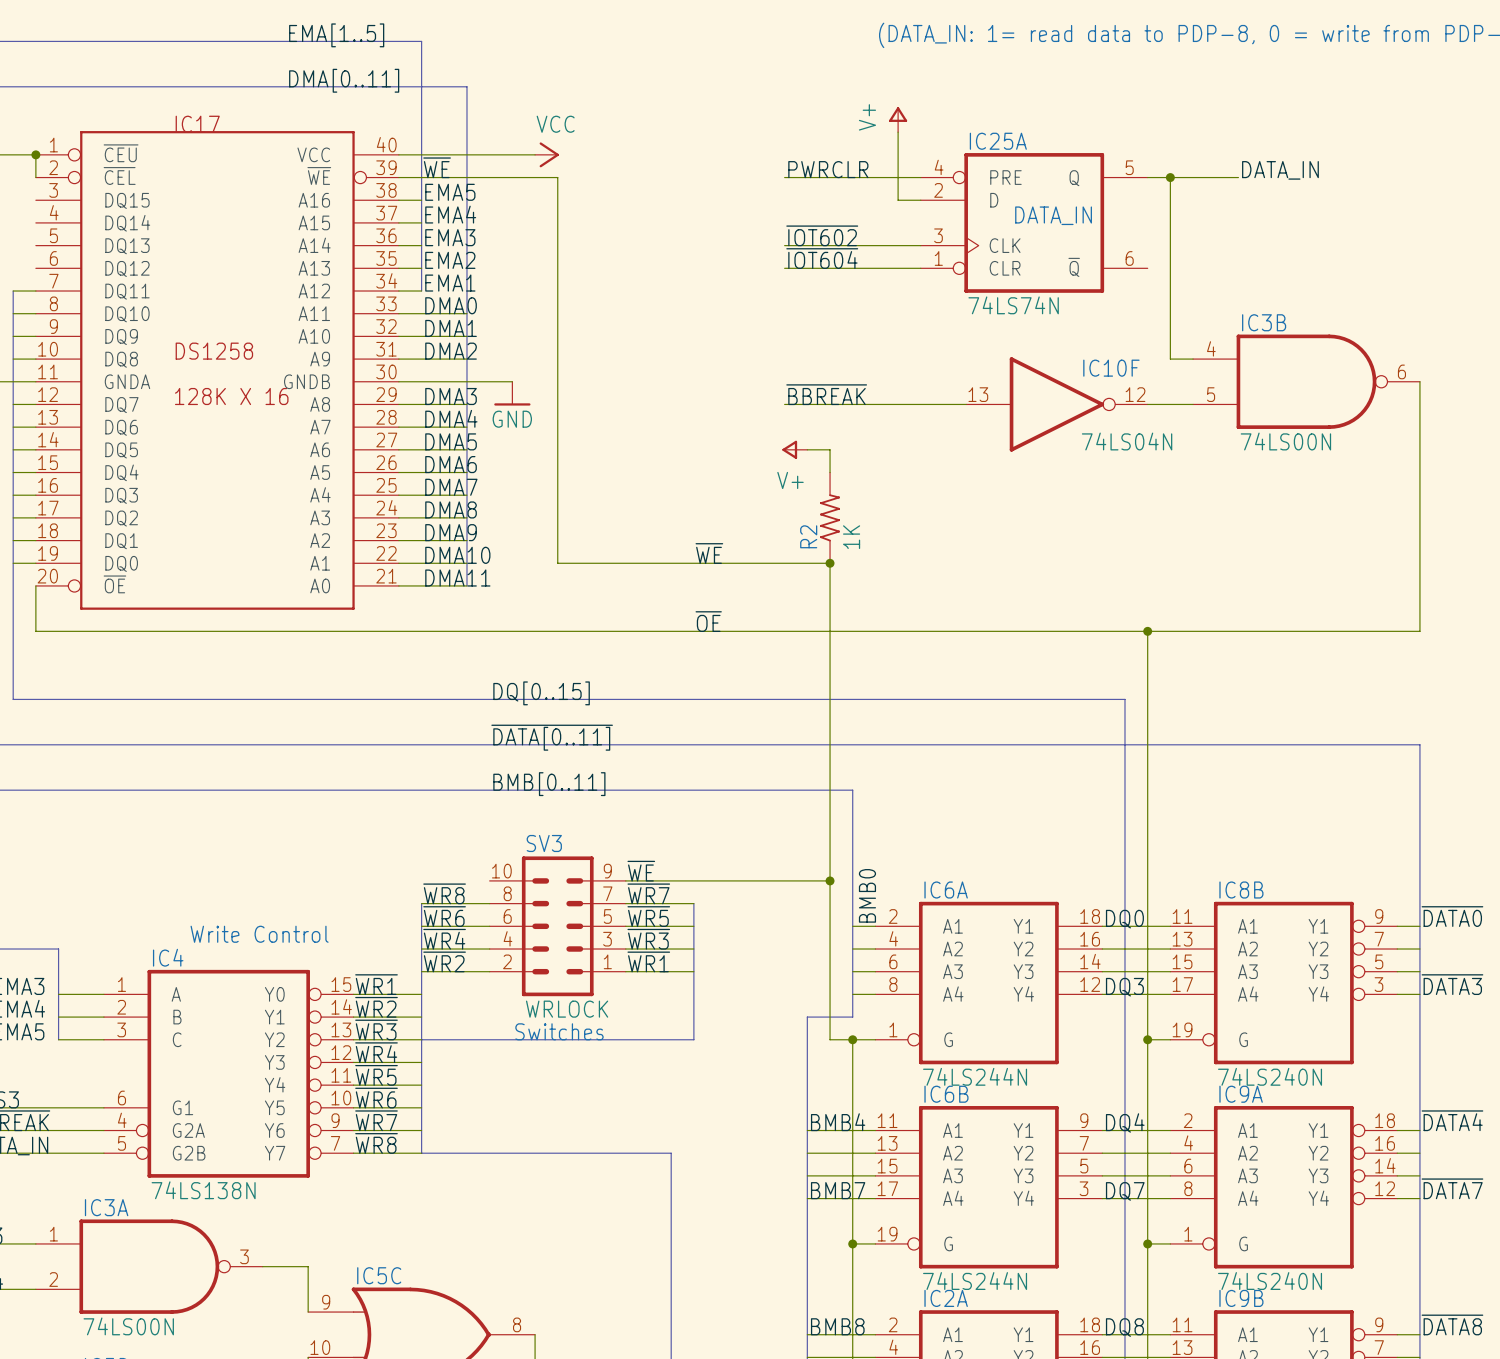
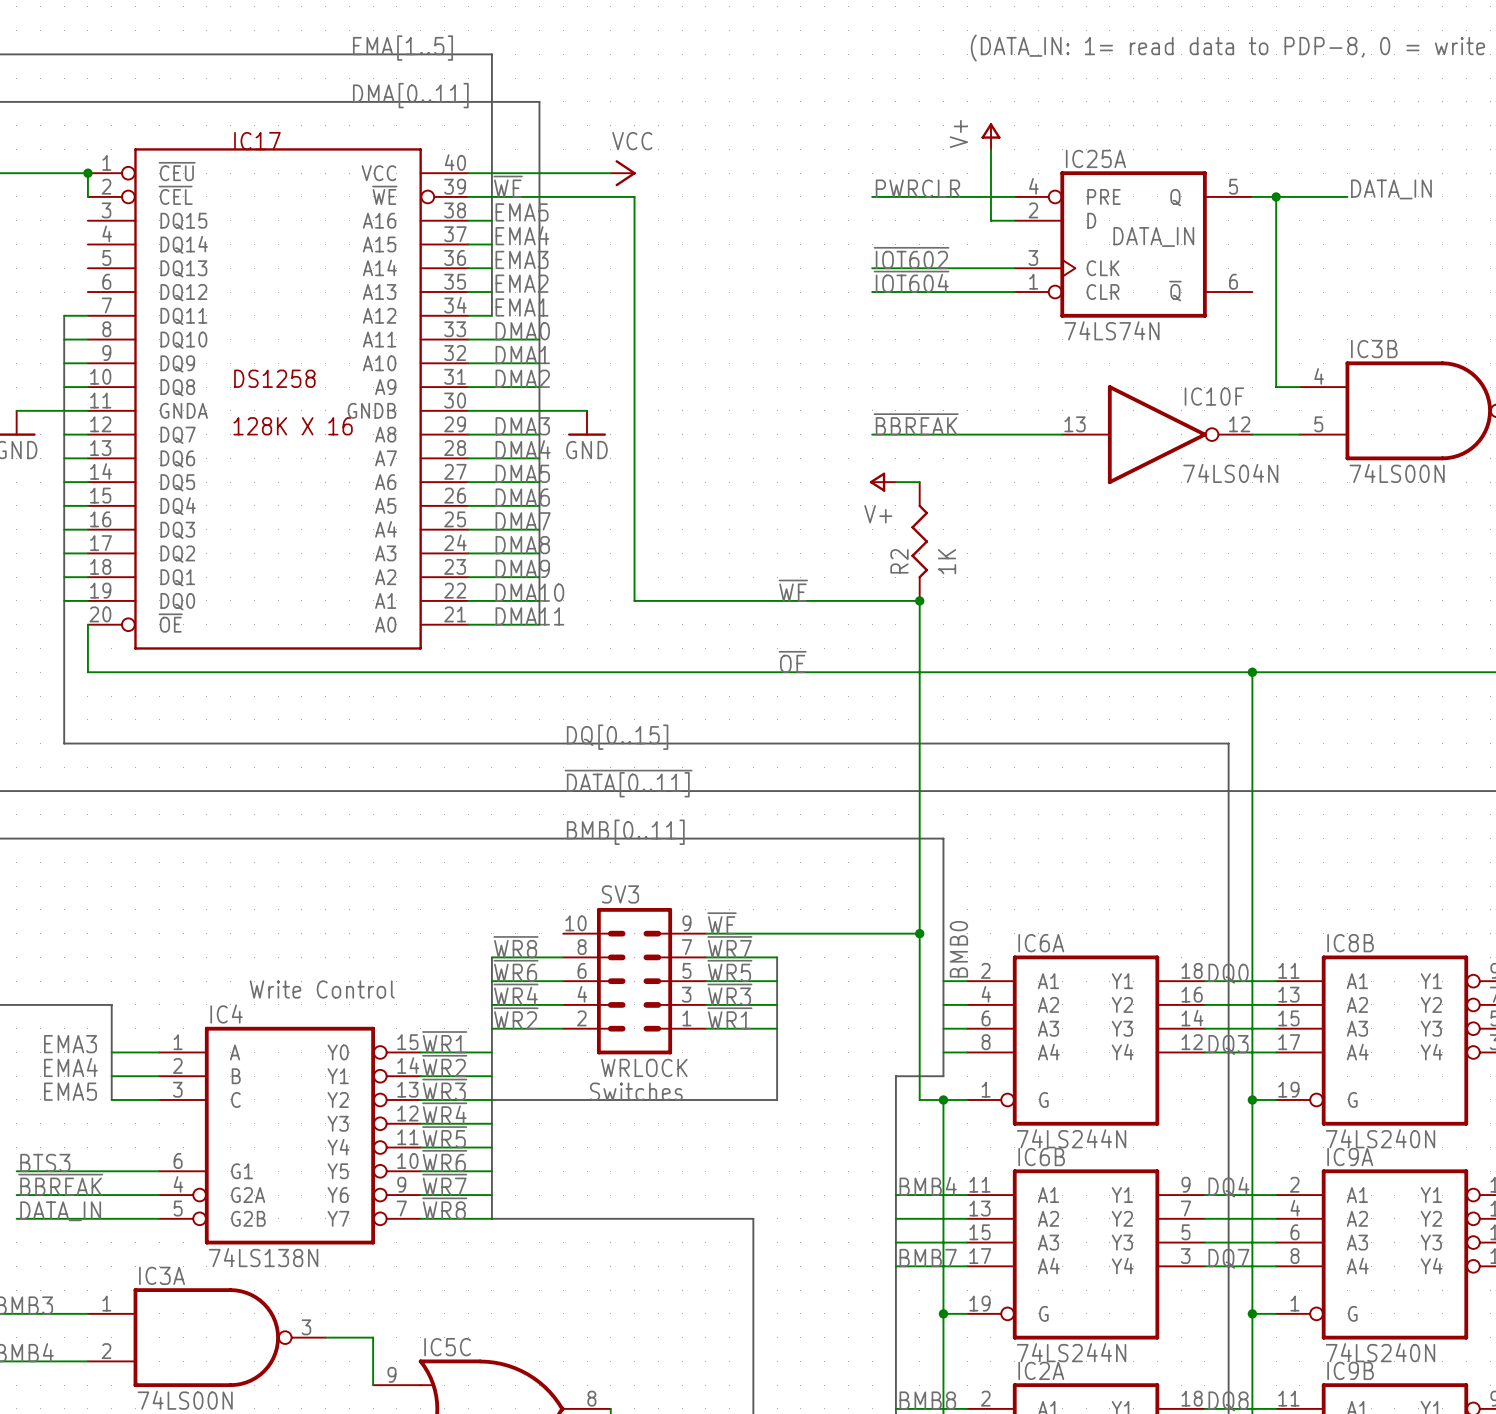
R2 symbol: [820, 472, 841, 564] -> [911, 482, 929, 601]

